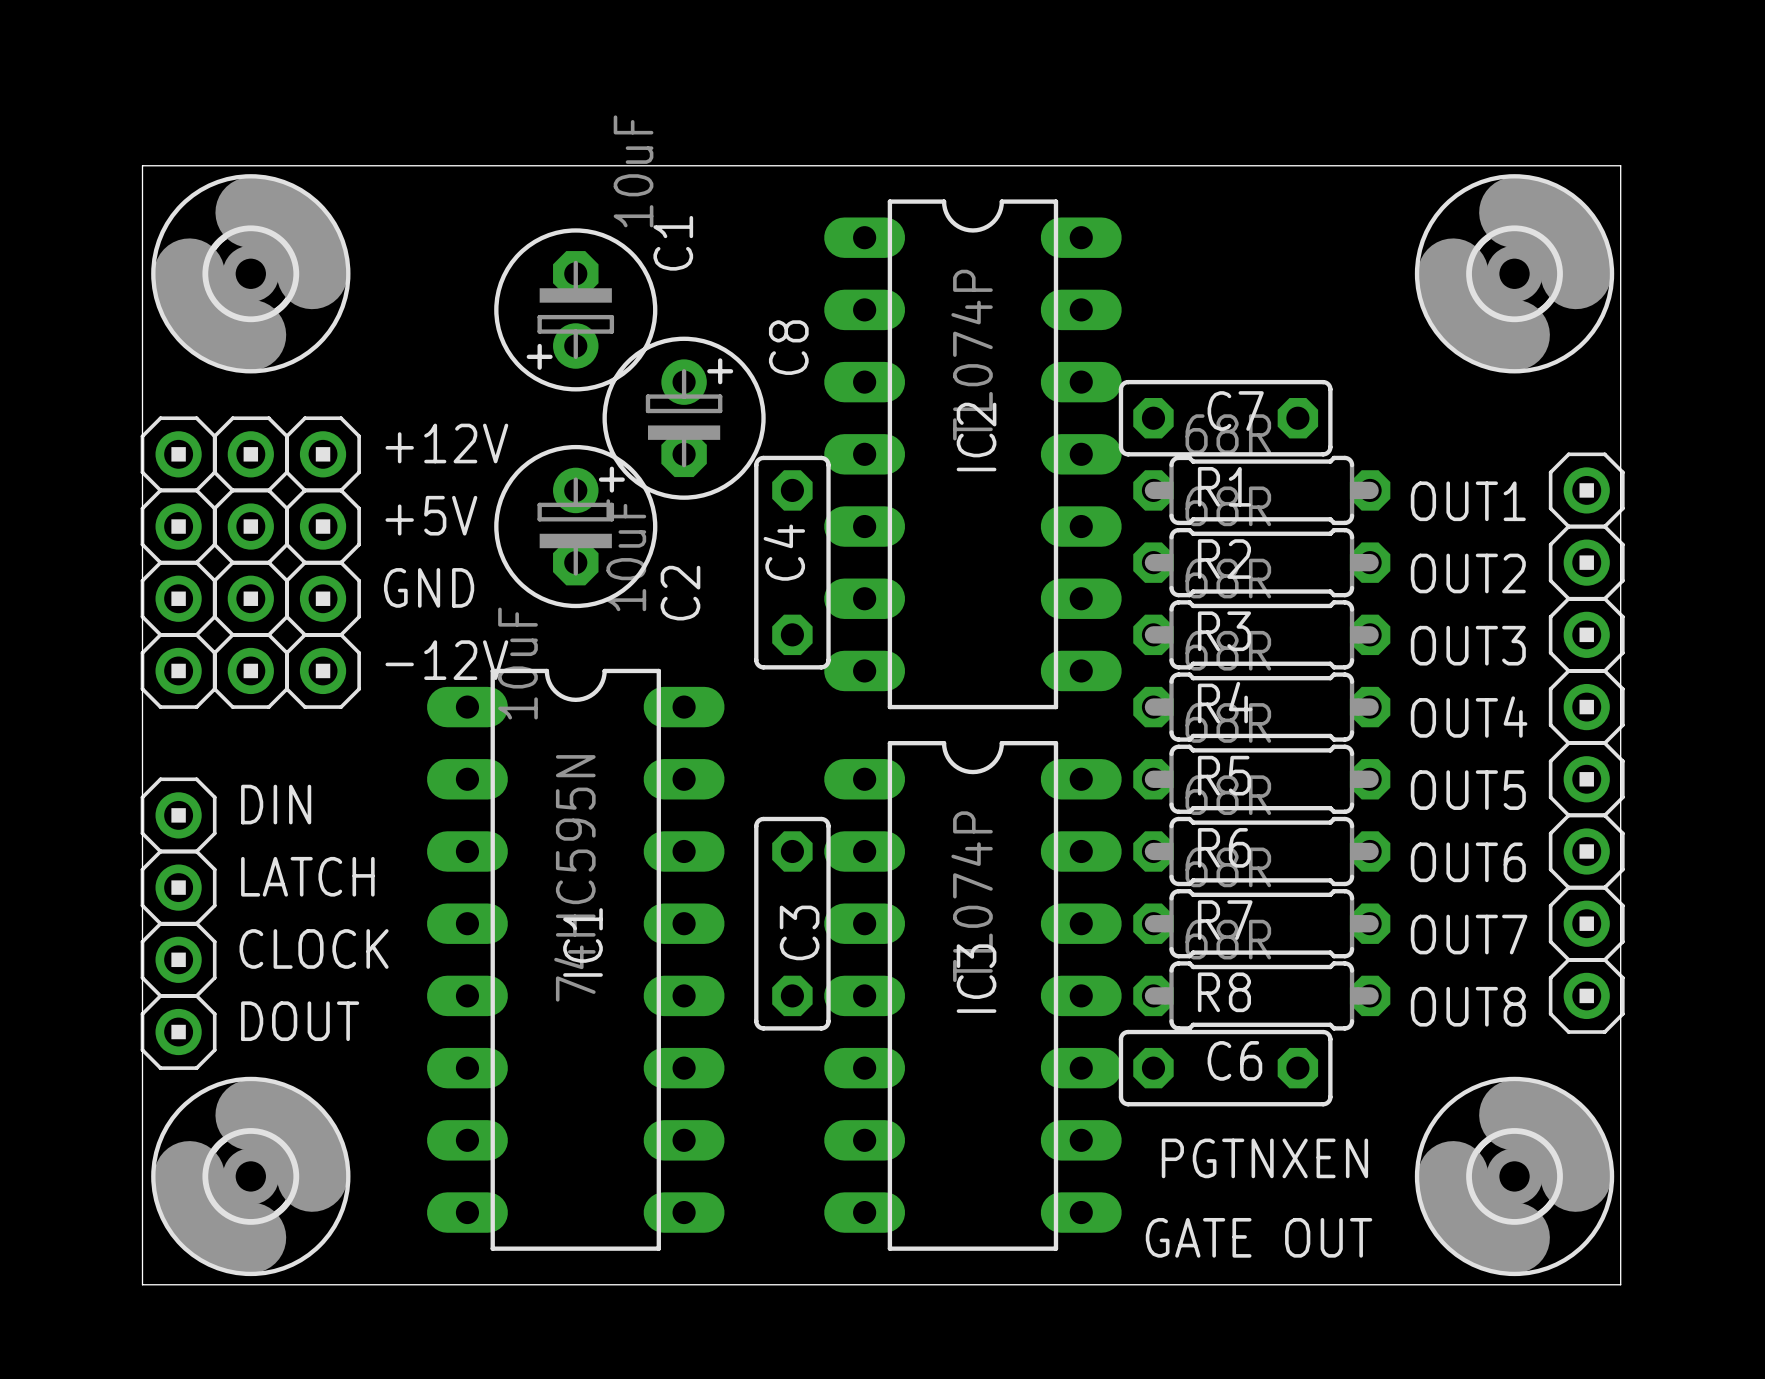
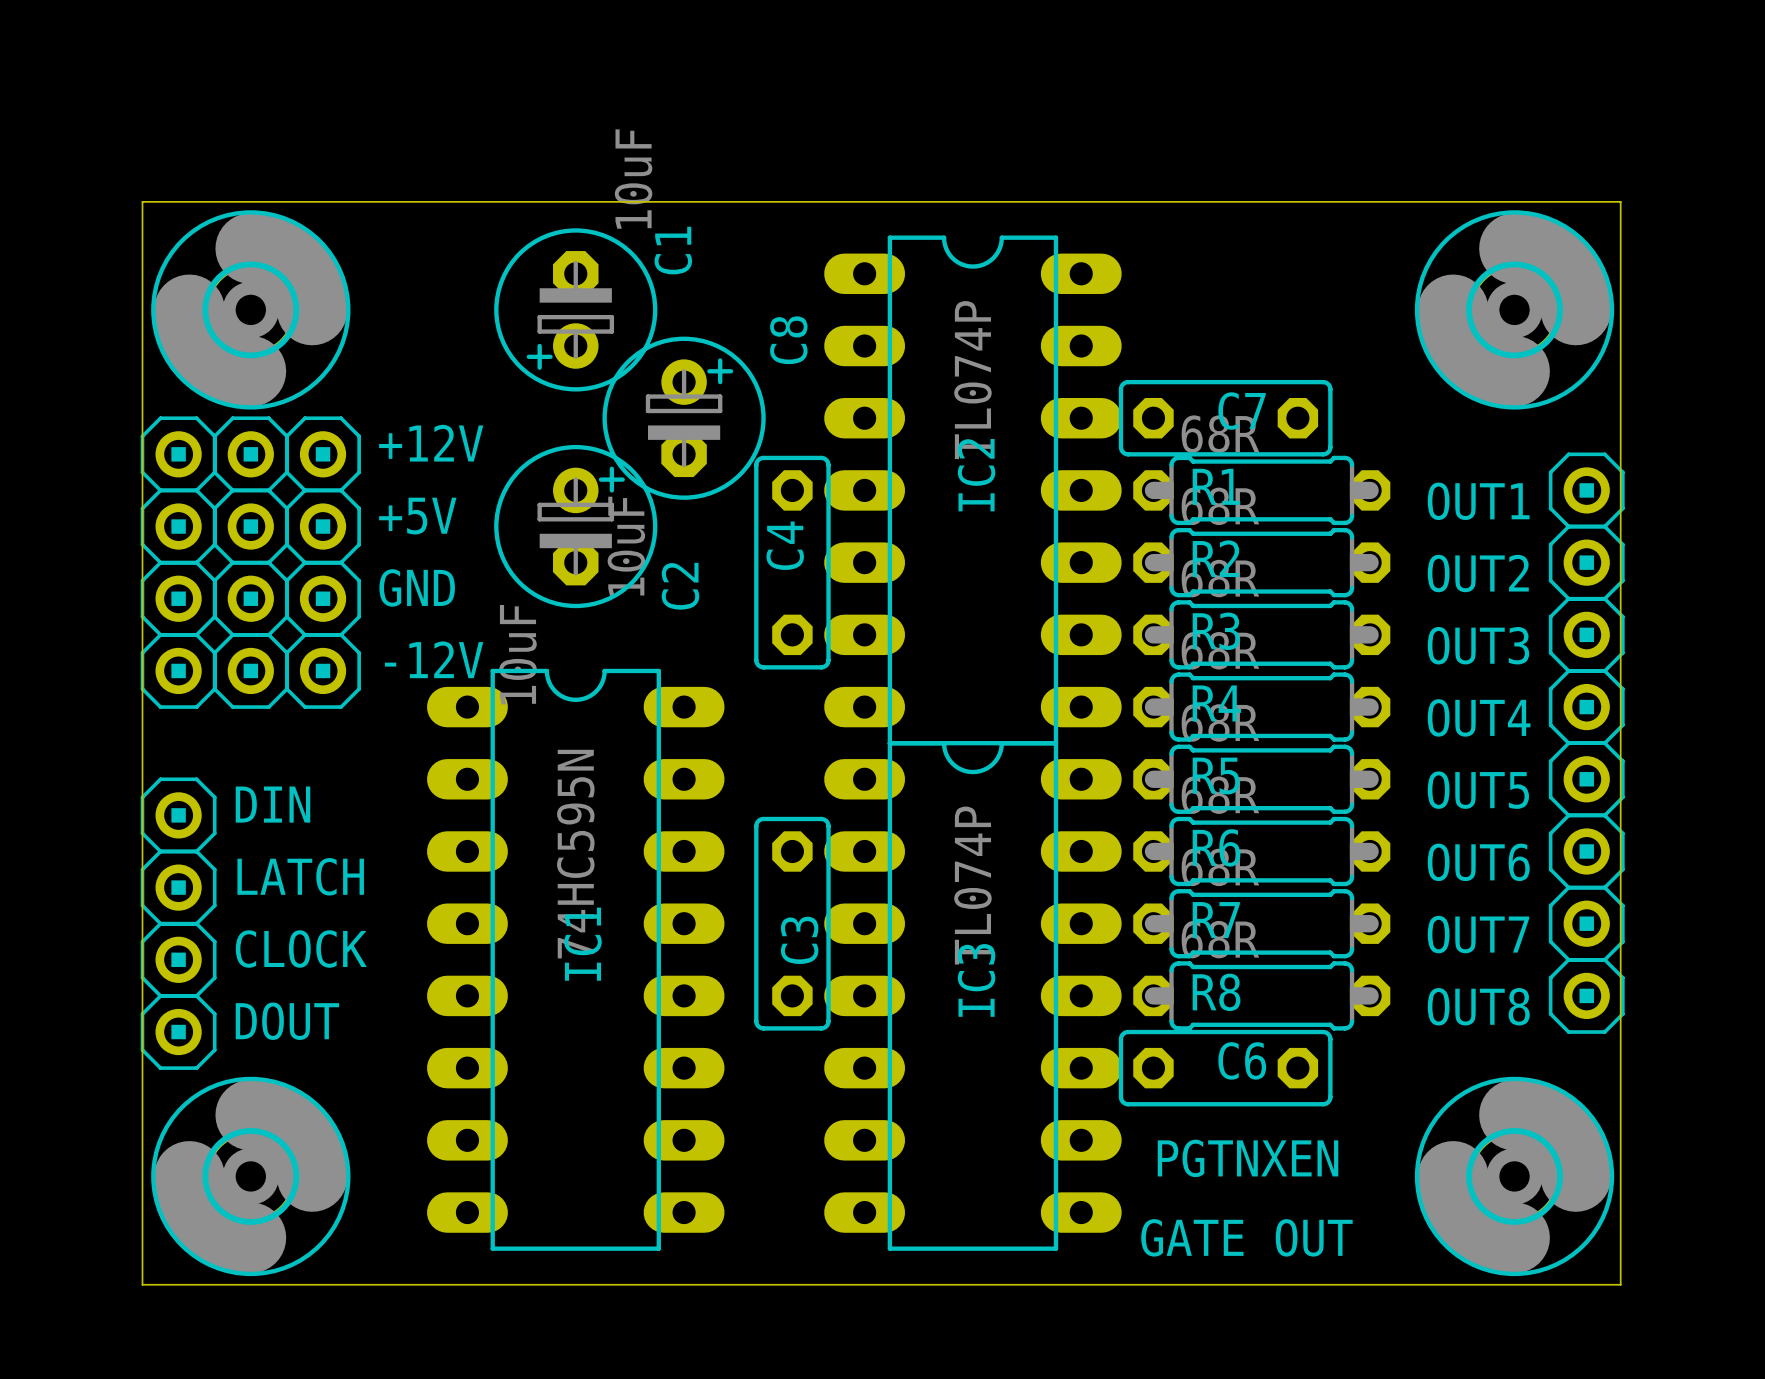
board edge: (142, 201) (142, 165) (1620, 165) (1620, 201) -> (142, 201) (1620, 201)
part position: (250, 273) -> (250, 309)
part position: (1514, 273) -> (1514, 309)
IC2 position: (972, 454) -> (972, 490)

